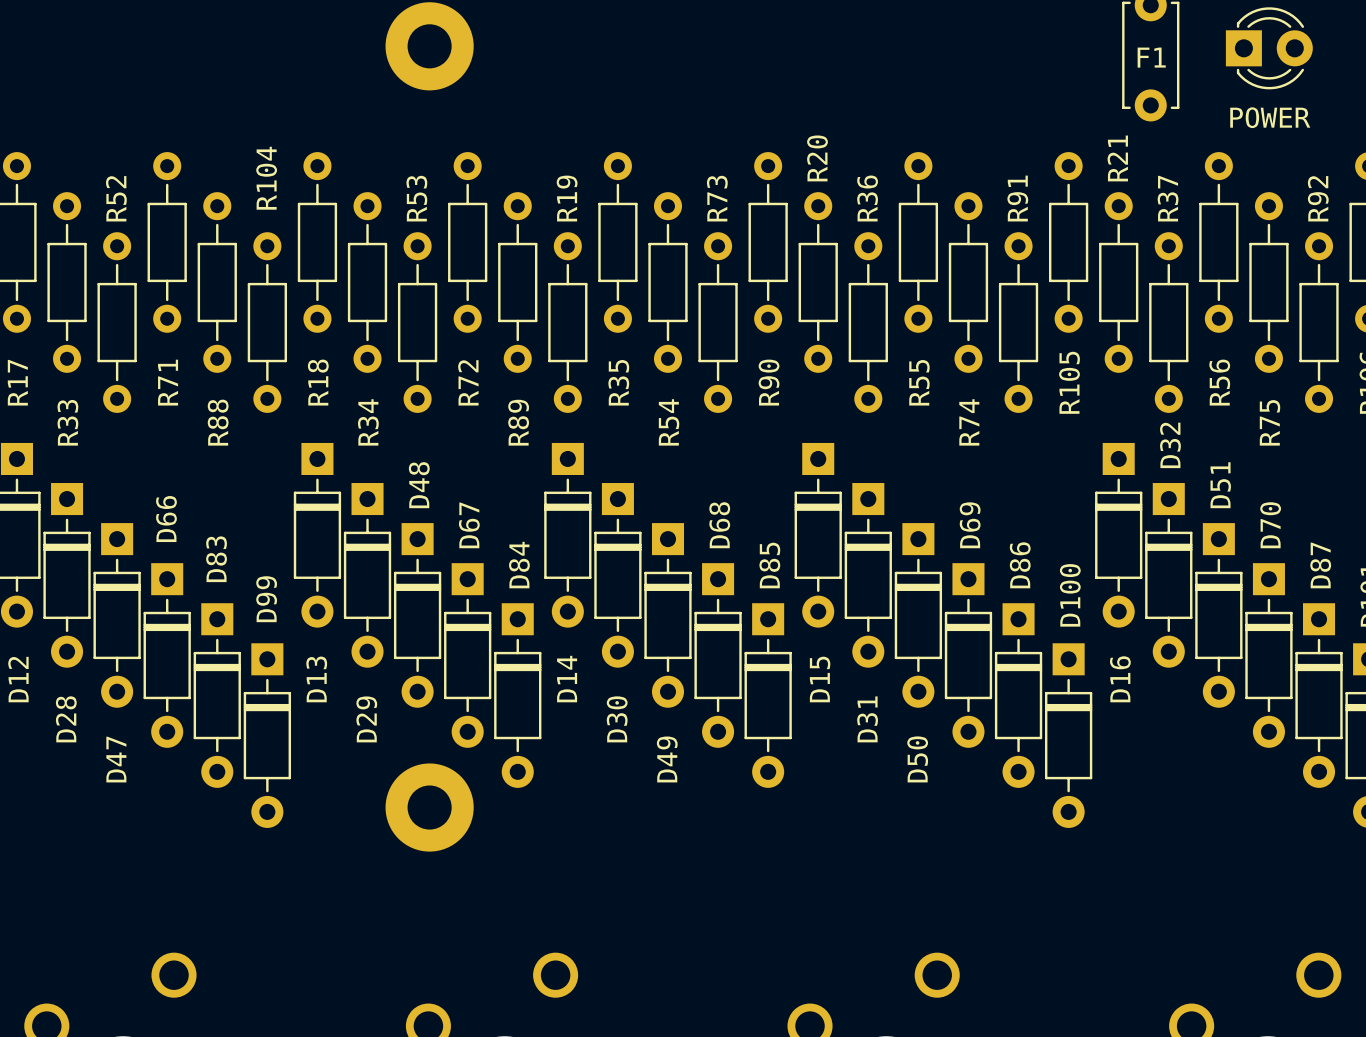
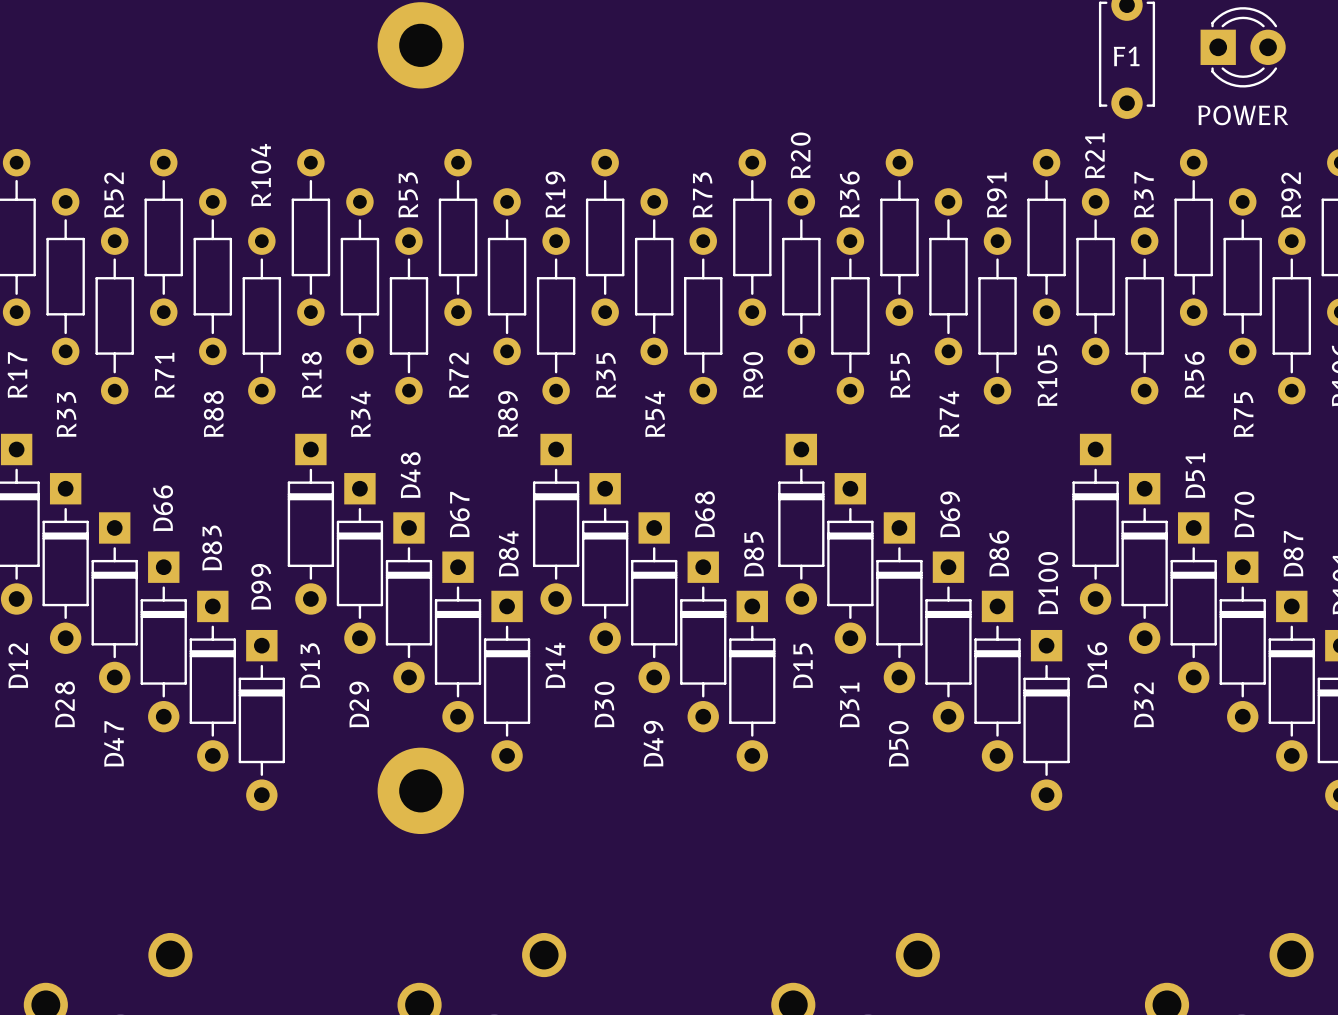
D32 name position: D32 (1170, 445) -> D32 (1143, 705)

